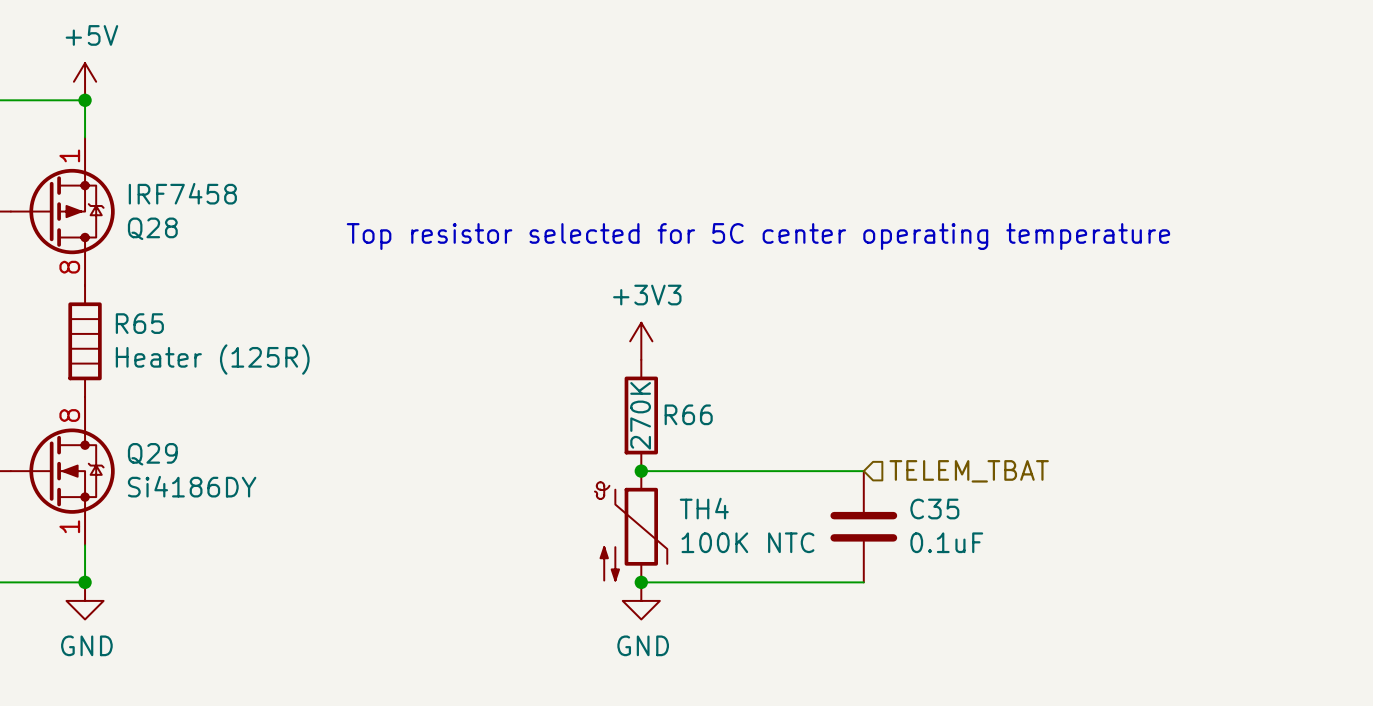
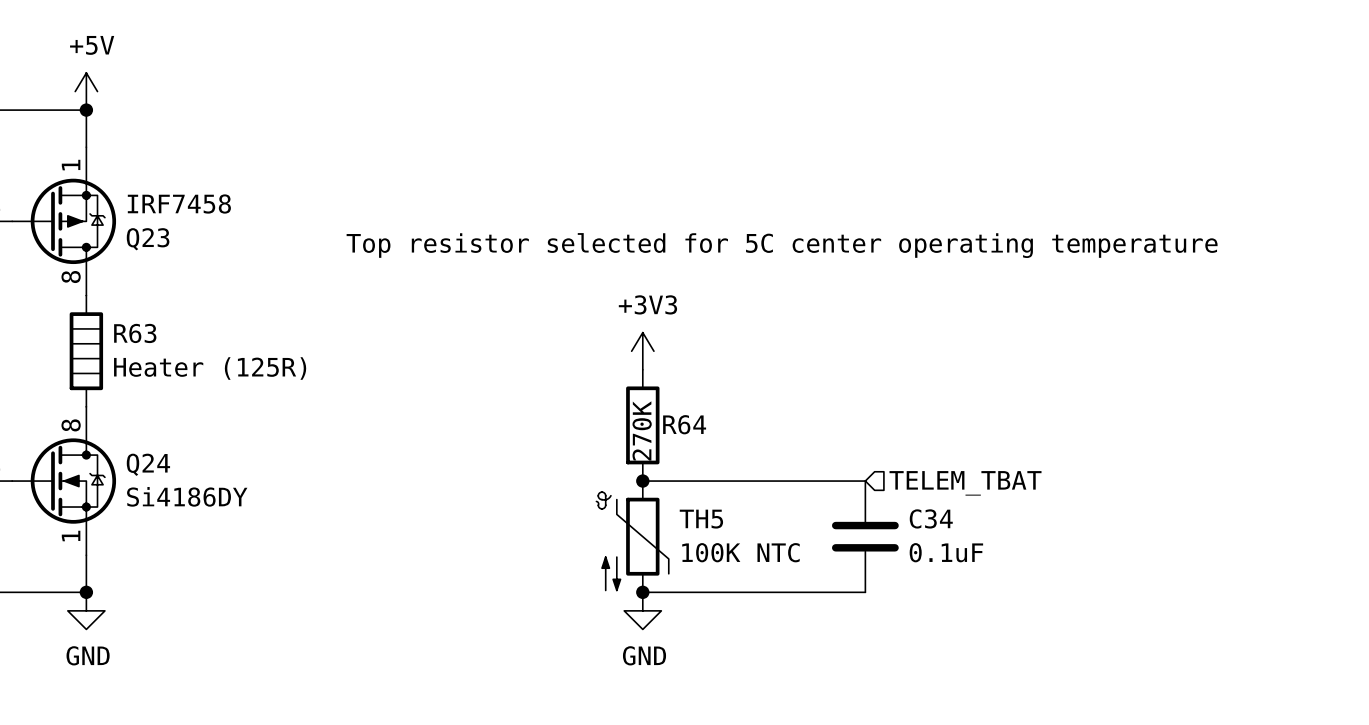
Q28 name: Q28 (152, 228) -> Q23 (148, 239)
R65 name: R65 (139, 323) -> R63 (135, 333)
R66 name: R66 (688, 414) -> R64 (684, 424)
Q29 name: Q29 (152, 454) -> Q24 (148, 464)
TH4 name: TH4 (704, 508) -> TH5 (701, 519)
C35 name: C35 (934, 509) -> C34 (931, 518)

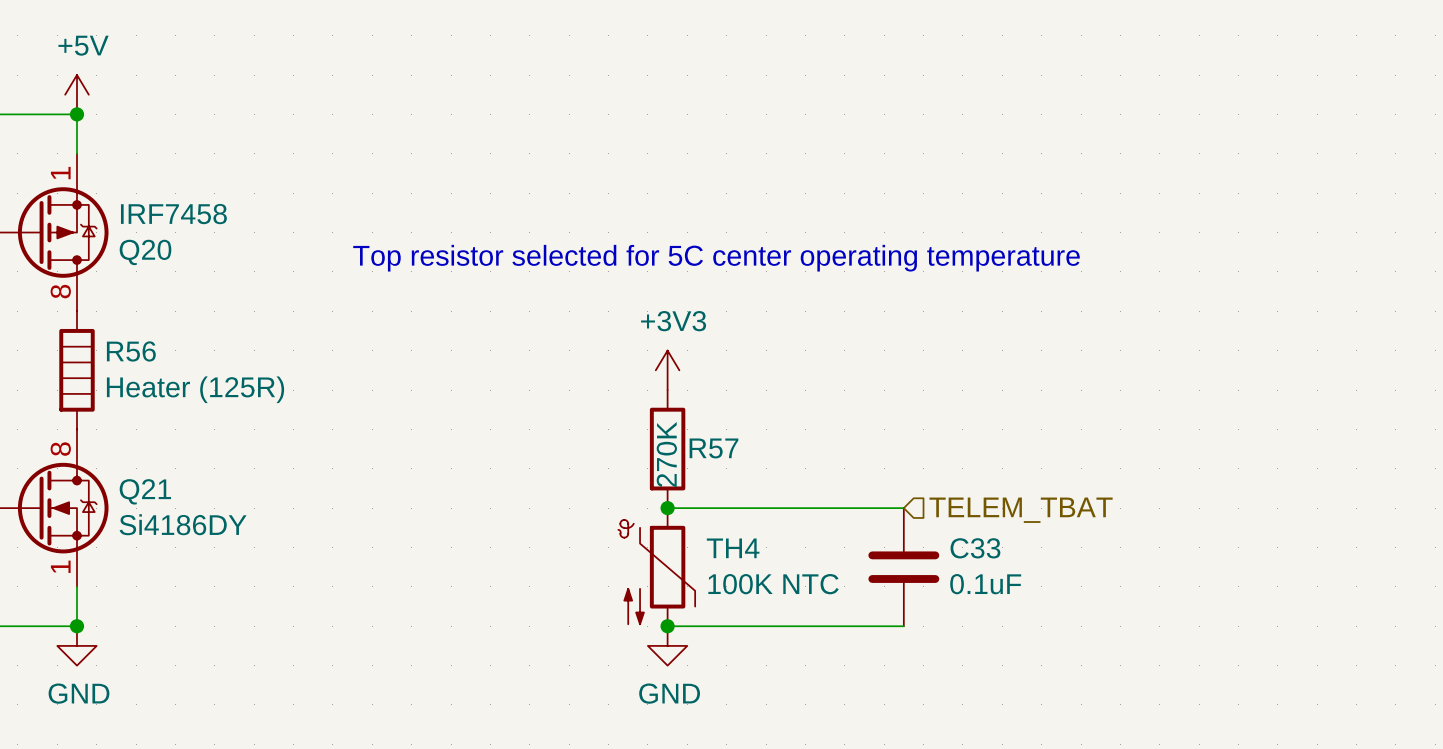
Q23 name: Q23 (148, 239) -> Q20 (145, 252)
R63 name: R63 (135, 333) -> R56 (131, 351)
R64 name: R64 (684, 424) -> R57 (713, 448)
Q24 name: Q24 (148, 464) -> Q21 (145, 491)
C34 name: C34 (931, 518) -> C33 (975, 548)
TH5 name: TH5 (701, 519) -> TH4 (733, 548)

